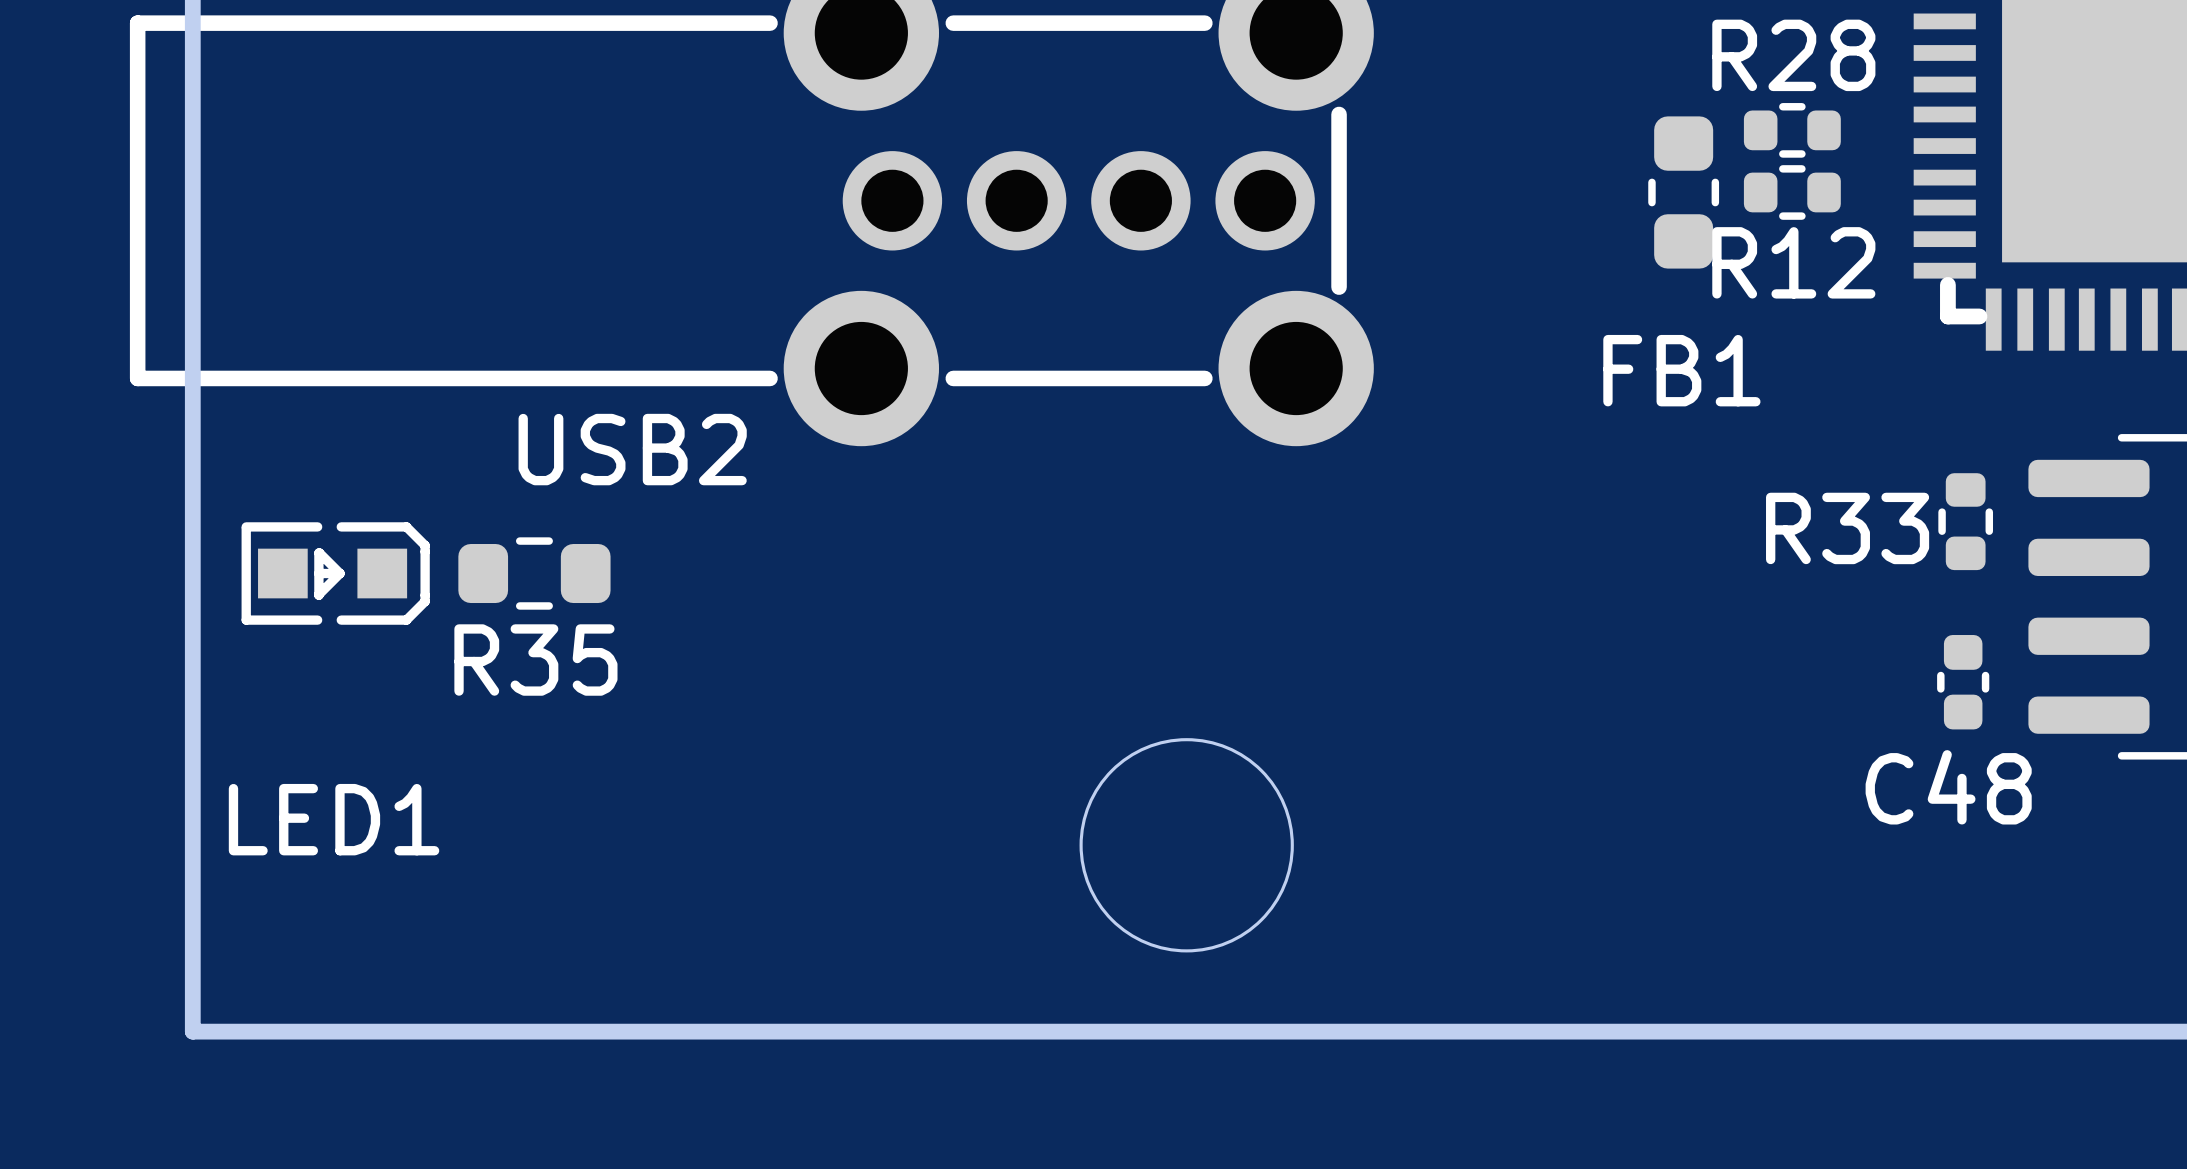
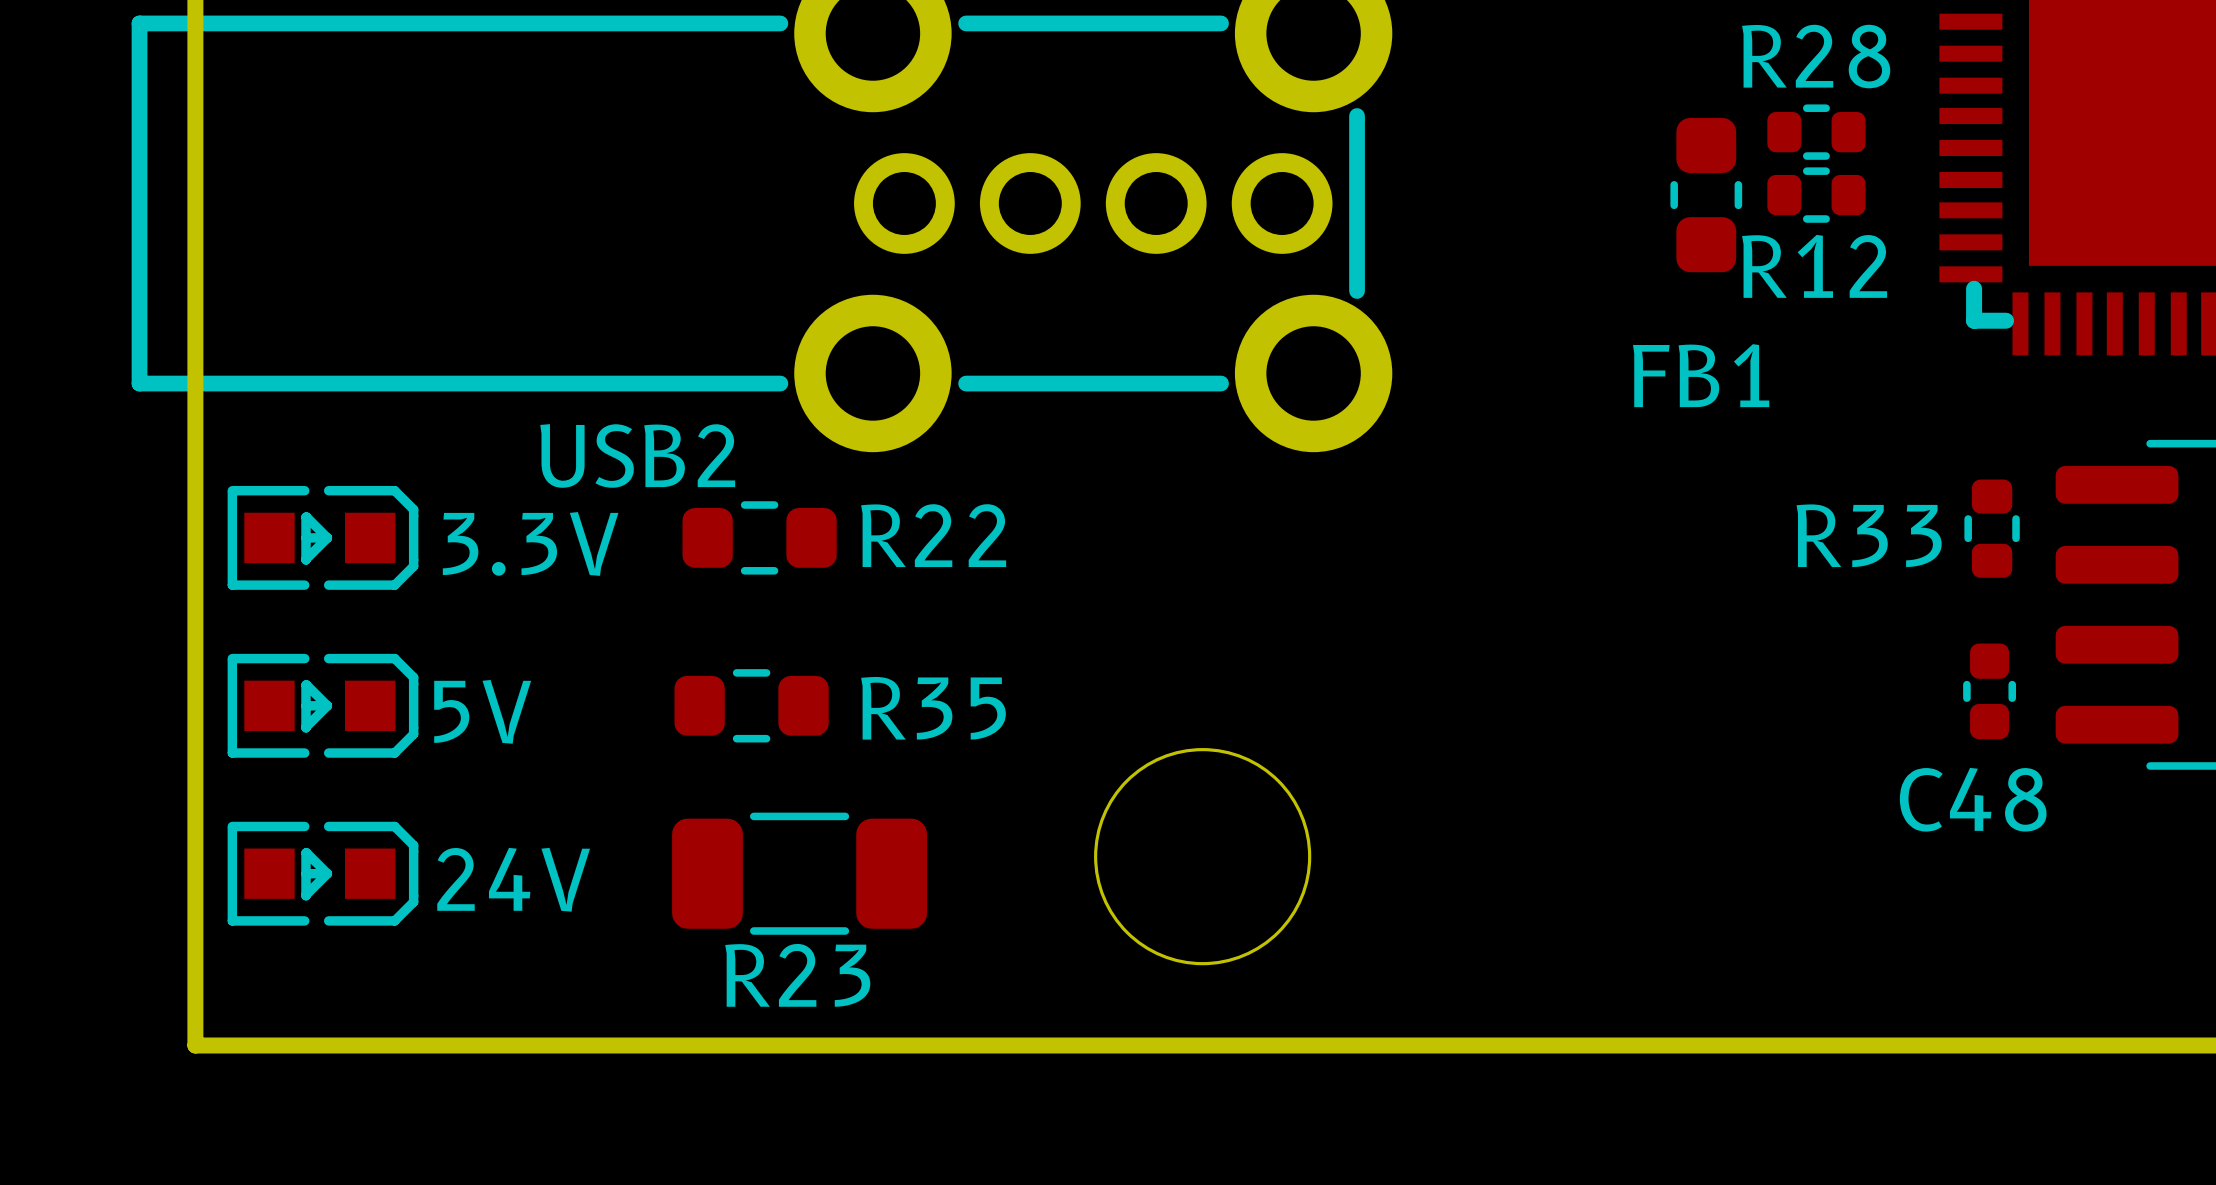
R22: none -> (759, 537)
text: none -> 3.3V (530, 543)
LED1 position: (335, 573) -> (323, 537)
R35 position: (534, 573) -> (751, 705)
R35 name position: R35 (535, 660) -> R35 (933, 708)
part: none -> (323, 705)
text: none -> 5V (482, 711)
LED1 name: LED1 (334, 819) -> none
part: none -> (323, 873)
R23: none -> (799, 873)
text: none -> 24V (513, 879)

